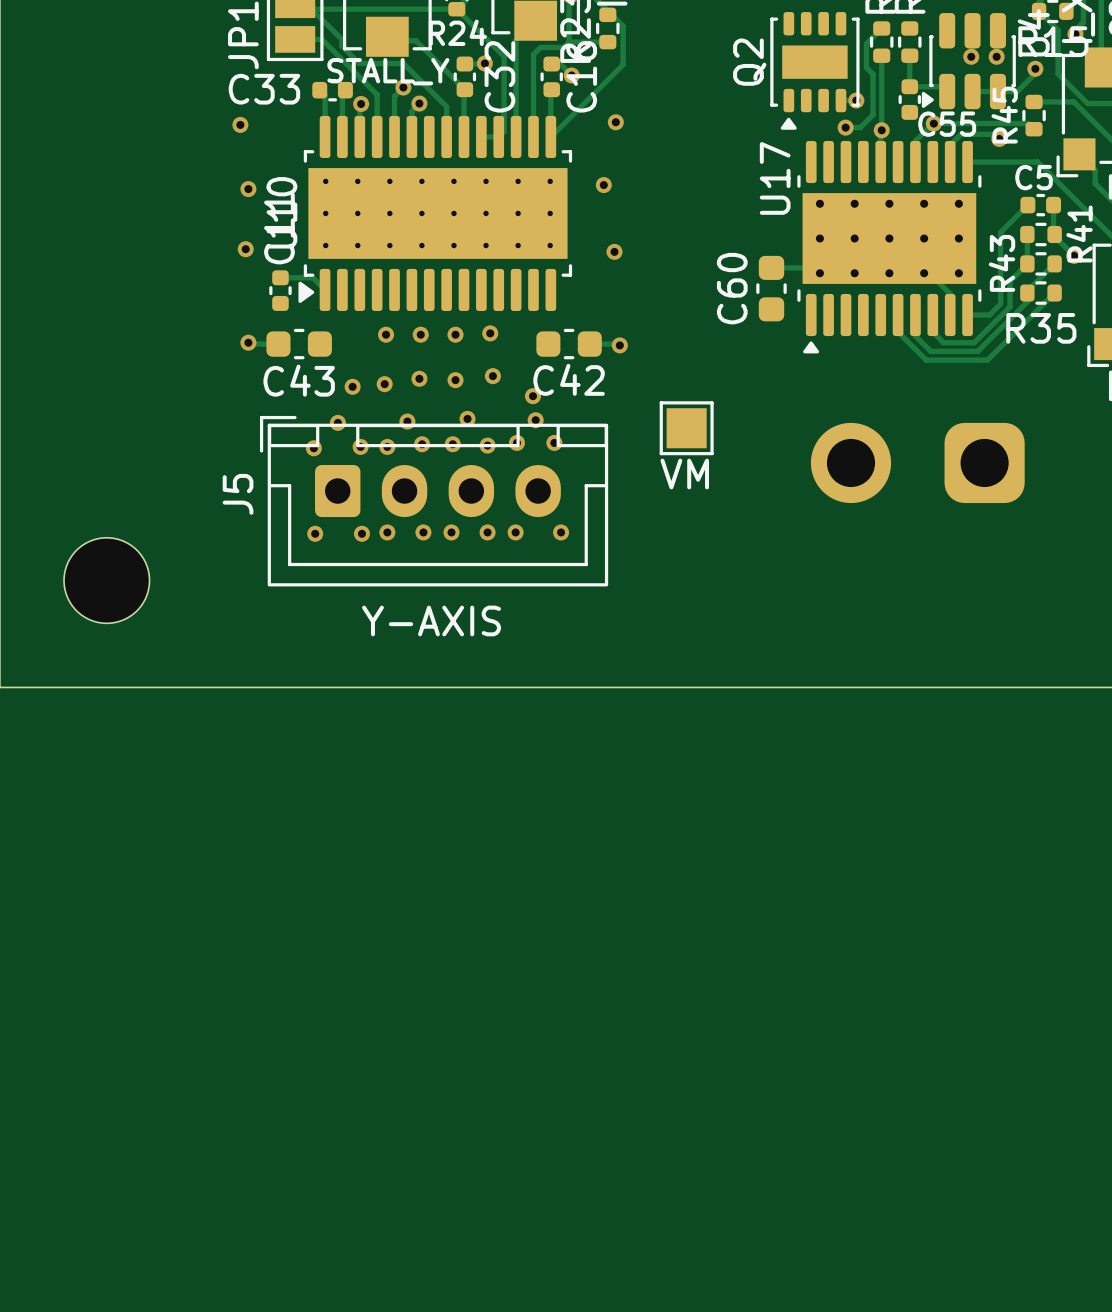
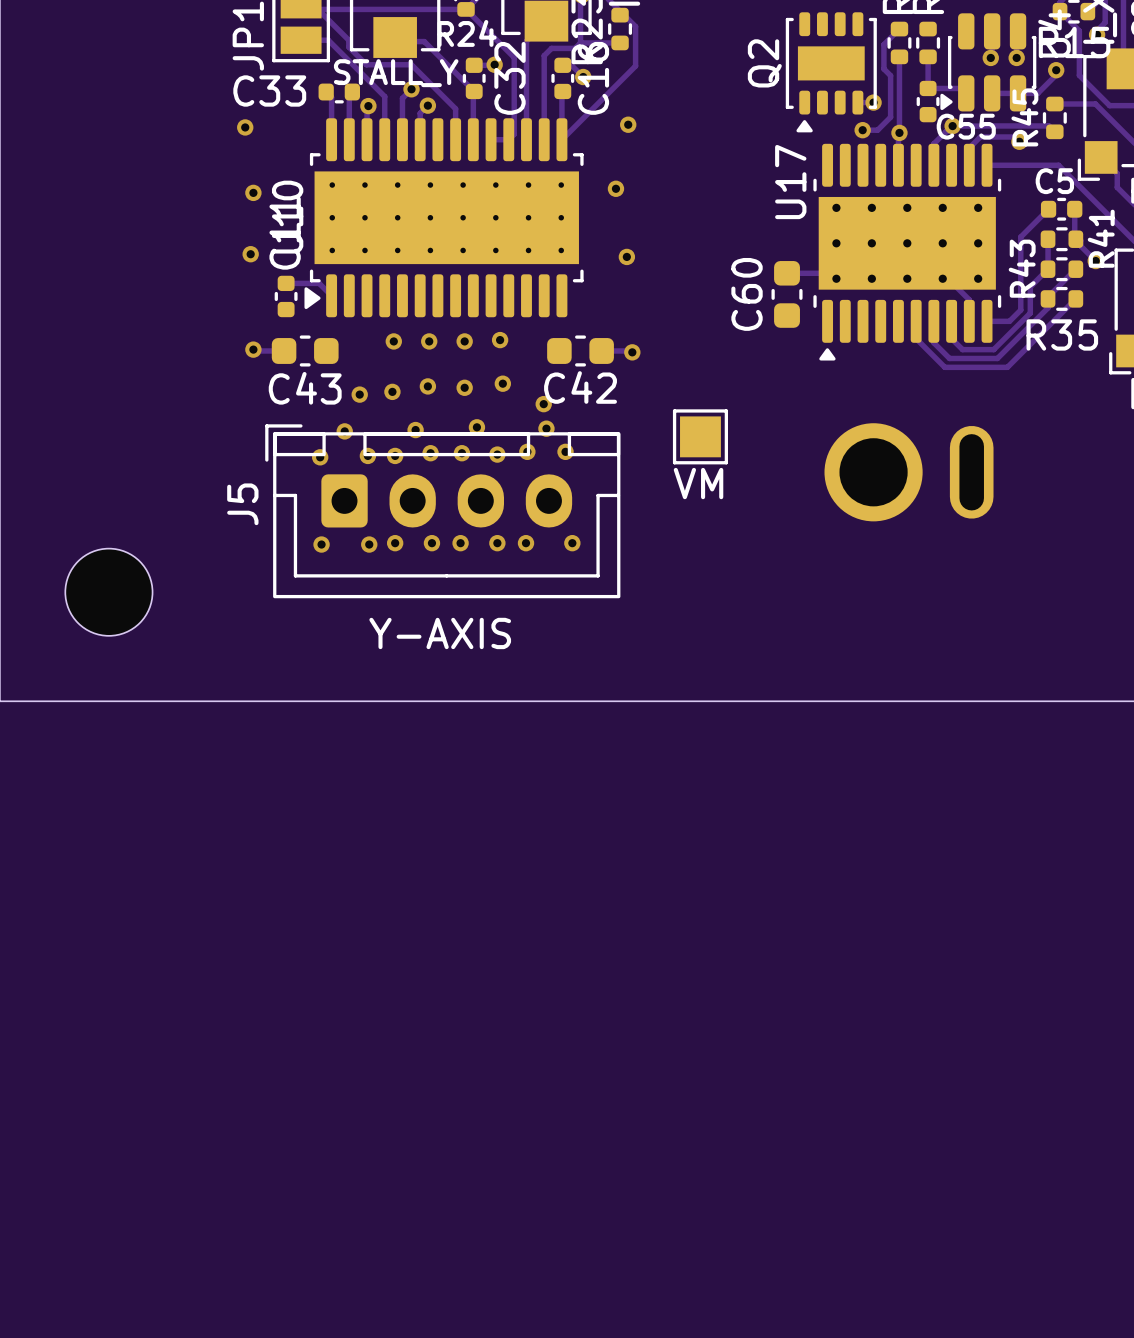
part footprint: [810, 422, 1025, 504] -> [824, 423, 994, 522]

